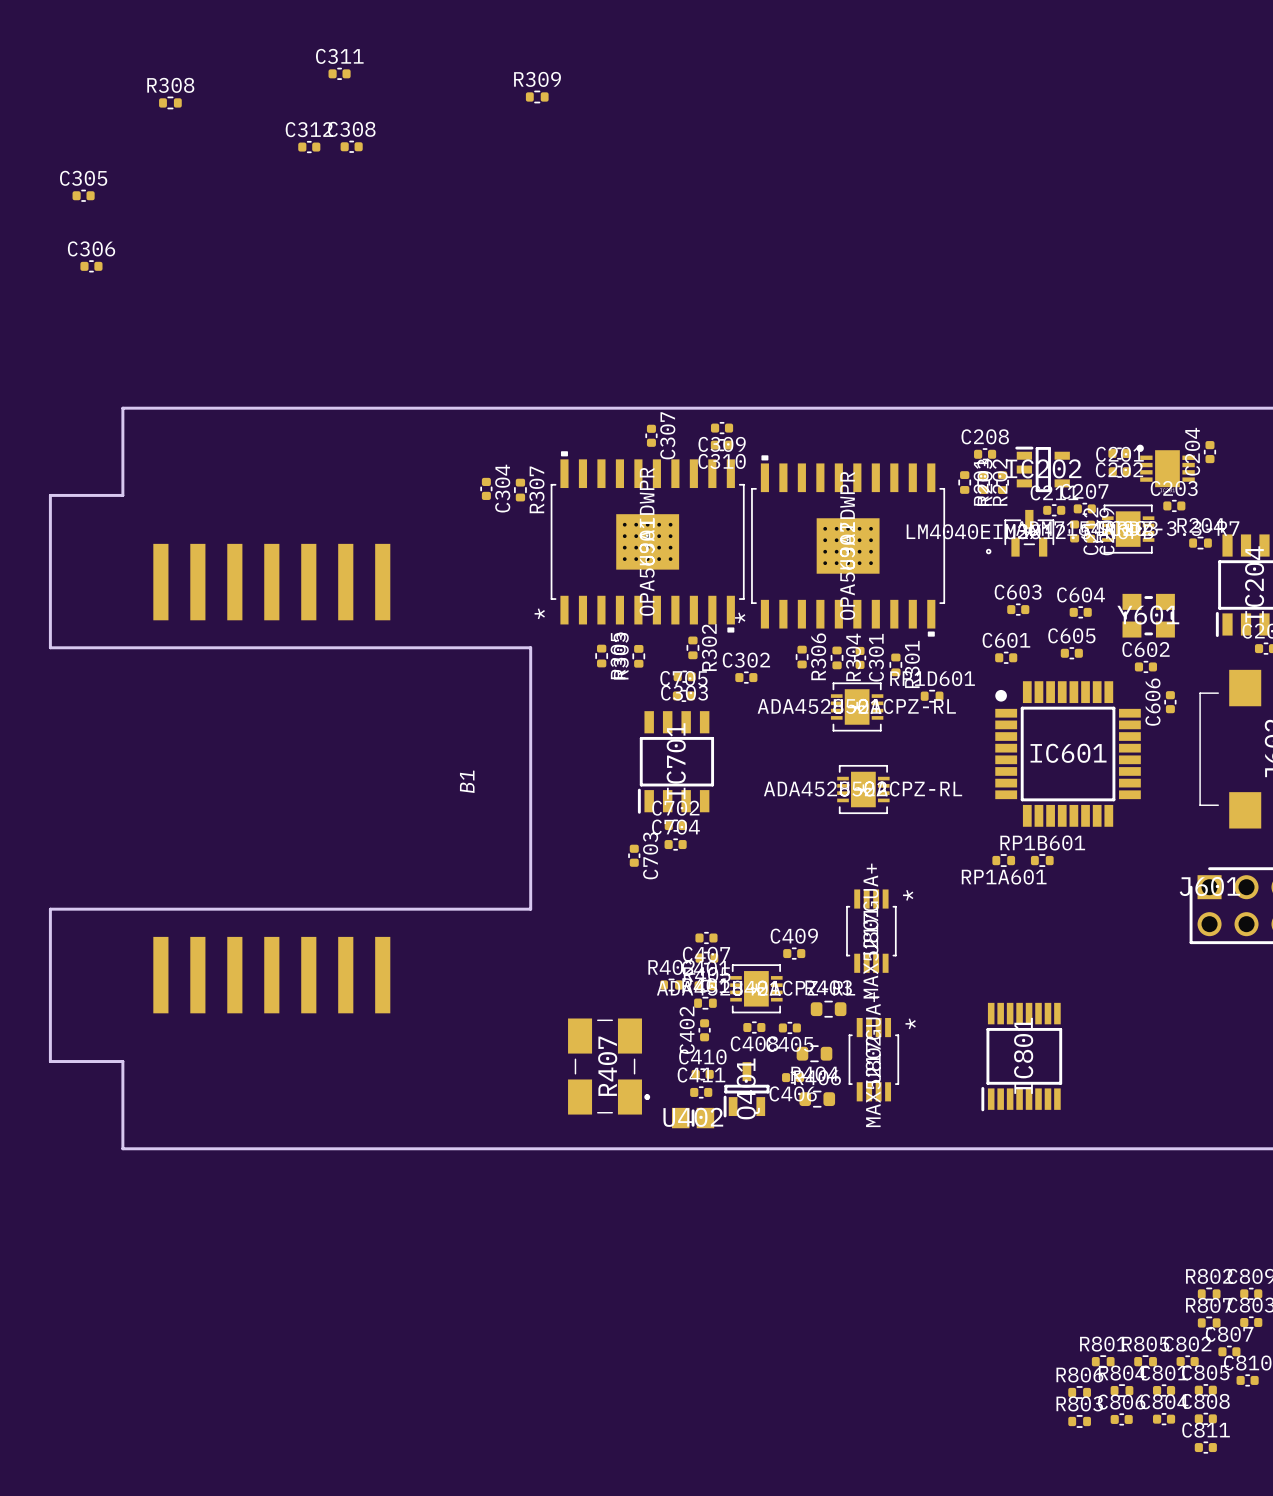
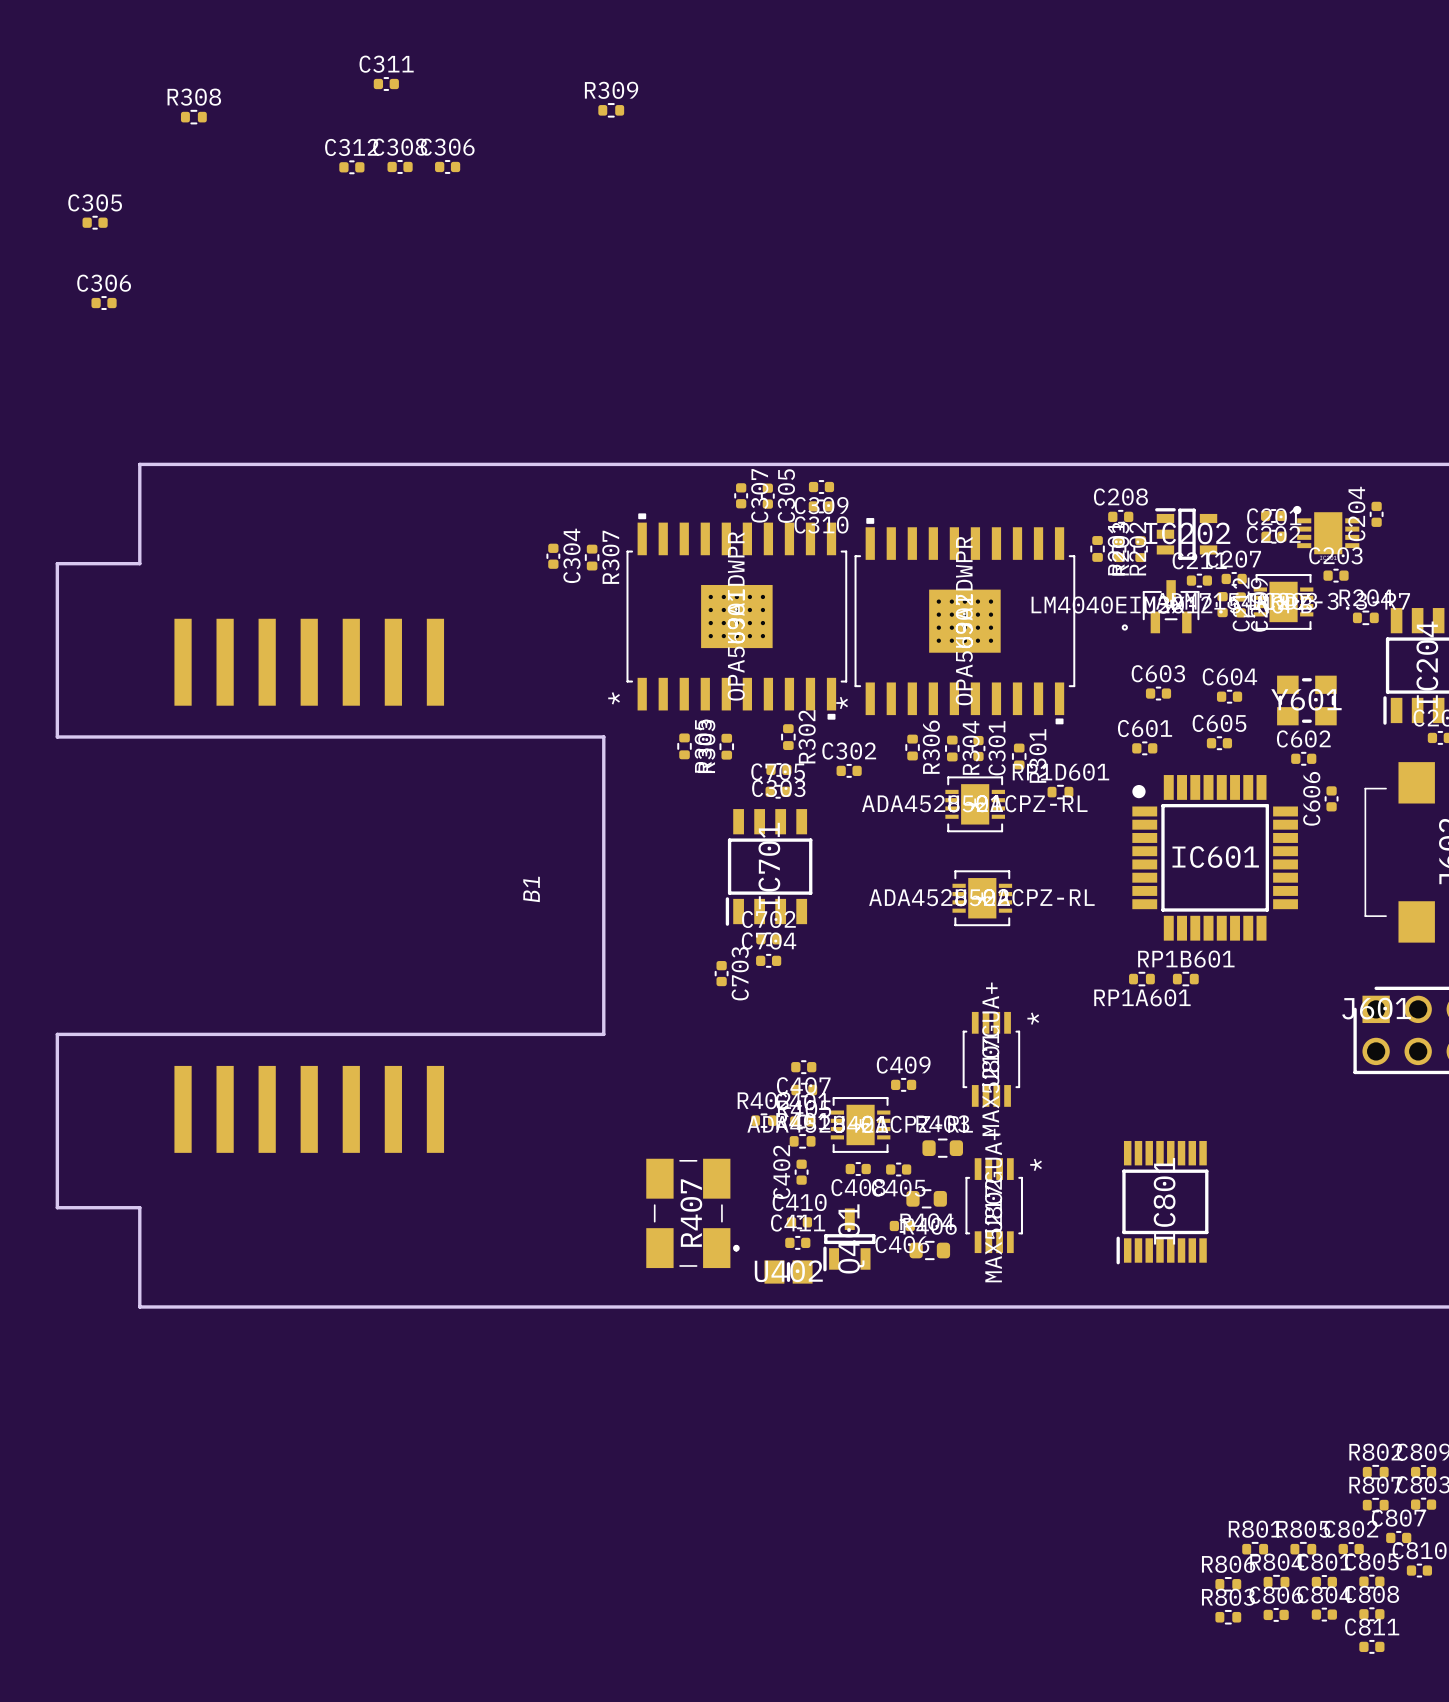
C306: none -> (447, 166)
C305: none -> (767, 496)

